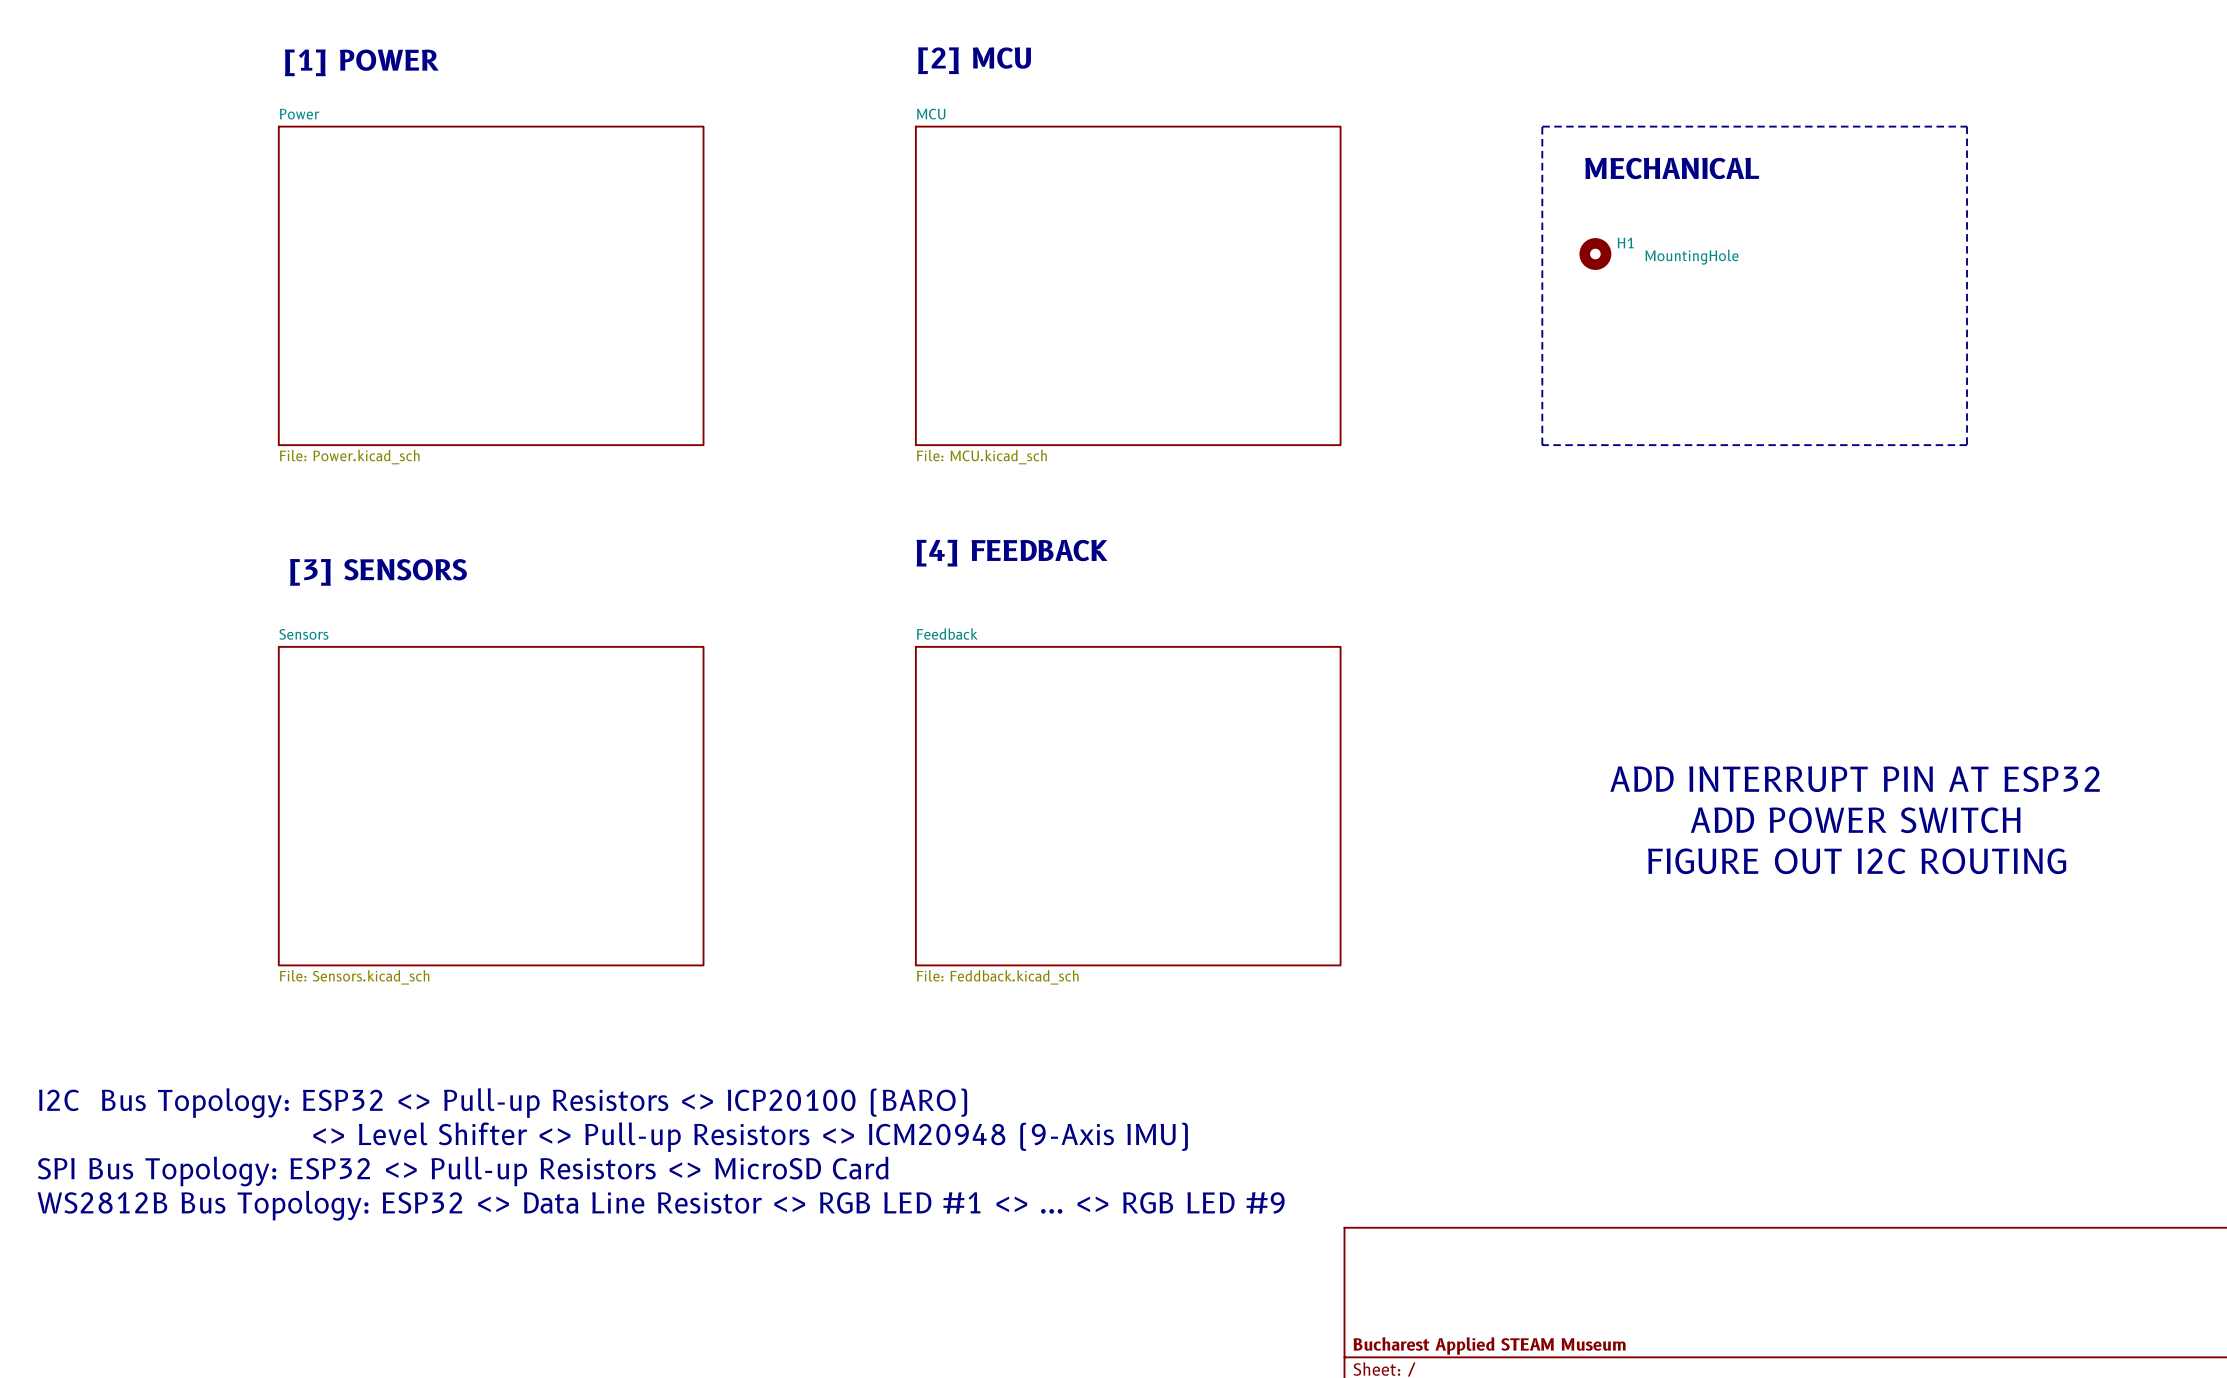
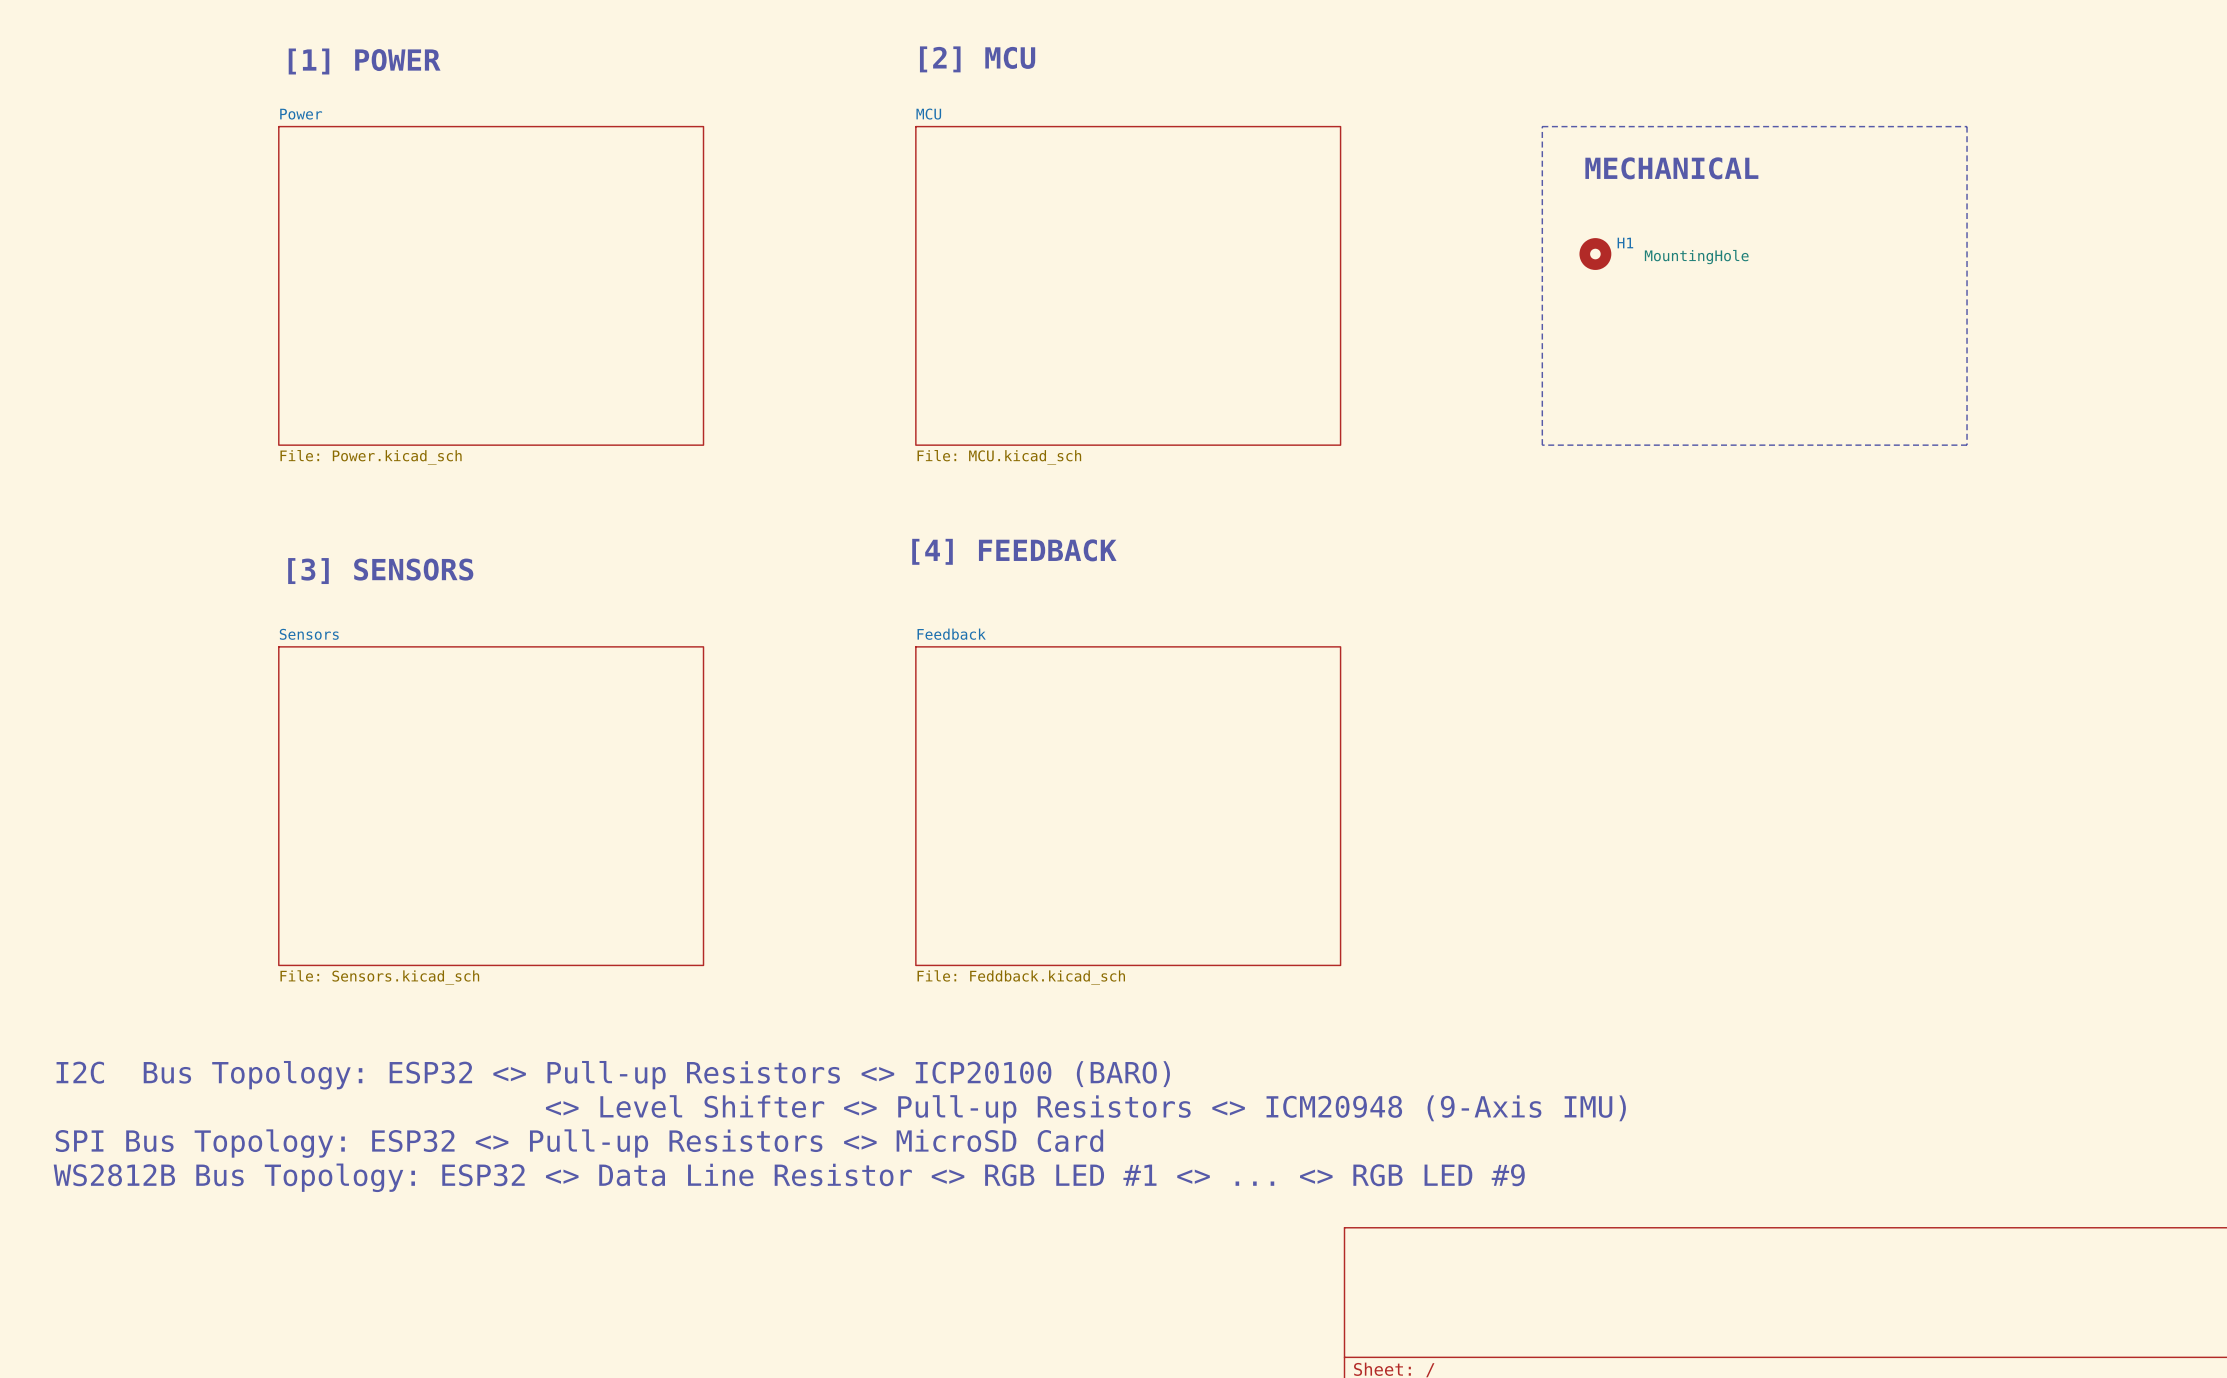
text: ADD INTERRUPT PIN AT ESP32 (1855, 779) -> none
text: ADD POWER SWITCH (1855, 820) -> none
text: FIGURE OUT I2C ROUTING (1857, 861) -> none
text position: I2C Bus Topology: ESP32 <> Pull-up Resistors <> ICP20100 (BARO) (503, 1103) -> I2C Bus Topology: ESP32 <> Pull-up Resistors <> ICP20100 (BARO) (613, 1075)
text position: <> Level Shifter <> Pull-up Resistors <> ICM20948 (9-Axis IMU) (750, 1137) -> <> Level Shifter <> Pull-up Resistors <> ICM20948 (9-Axis IMU) (1085, 1109)
text position: SPI Bus Topology: ESP32 <> Pull-up Resistors <> MicroSD Card (463, 1171) -> SPI Bus Topology: ESP32 <> Pull-up Resistors <> MicroSD Card (579, 1143)
text position: WS2812B Bus Topology: ESP32 <> Data Line Resistor <> RGB LED #1 <> ... <> RGB LED #9 (661, 1205) -> WS2812B Bus Topology: ESP32 <> Data Line Resistor <> RGB LED #1 <> ... <> RGB LED #9 (789, 1177)
title block: Bucharest Applied STEAM Museum (1489, 1345) -> none

